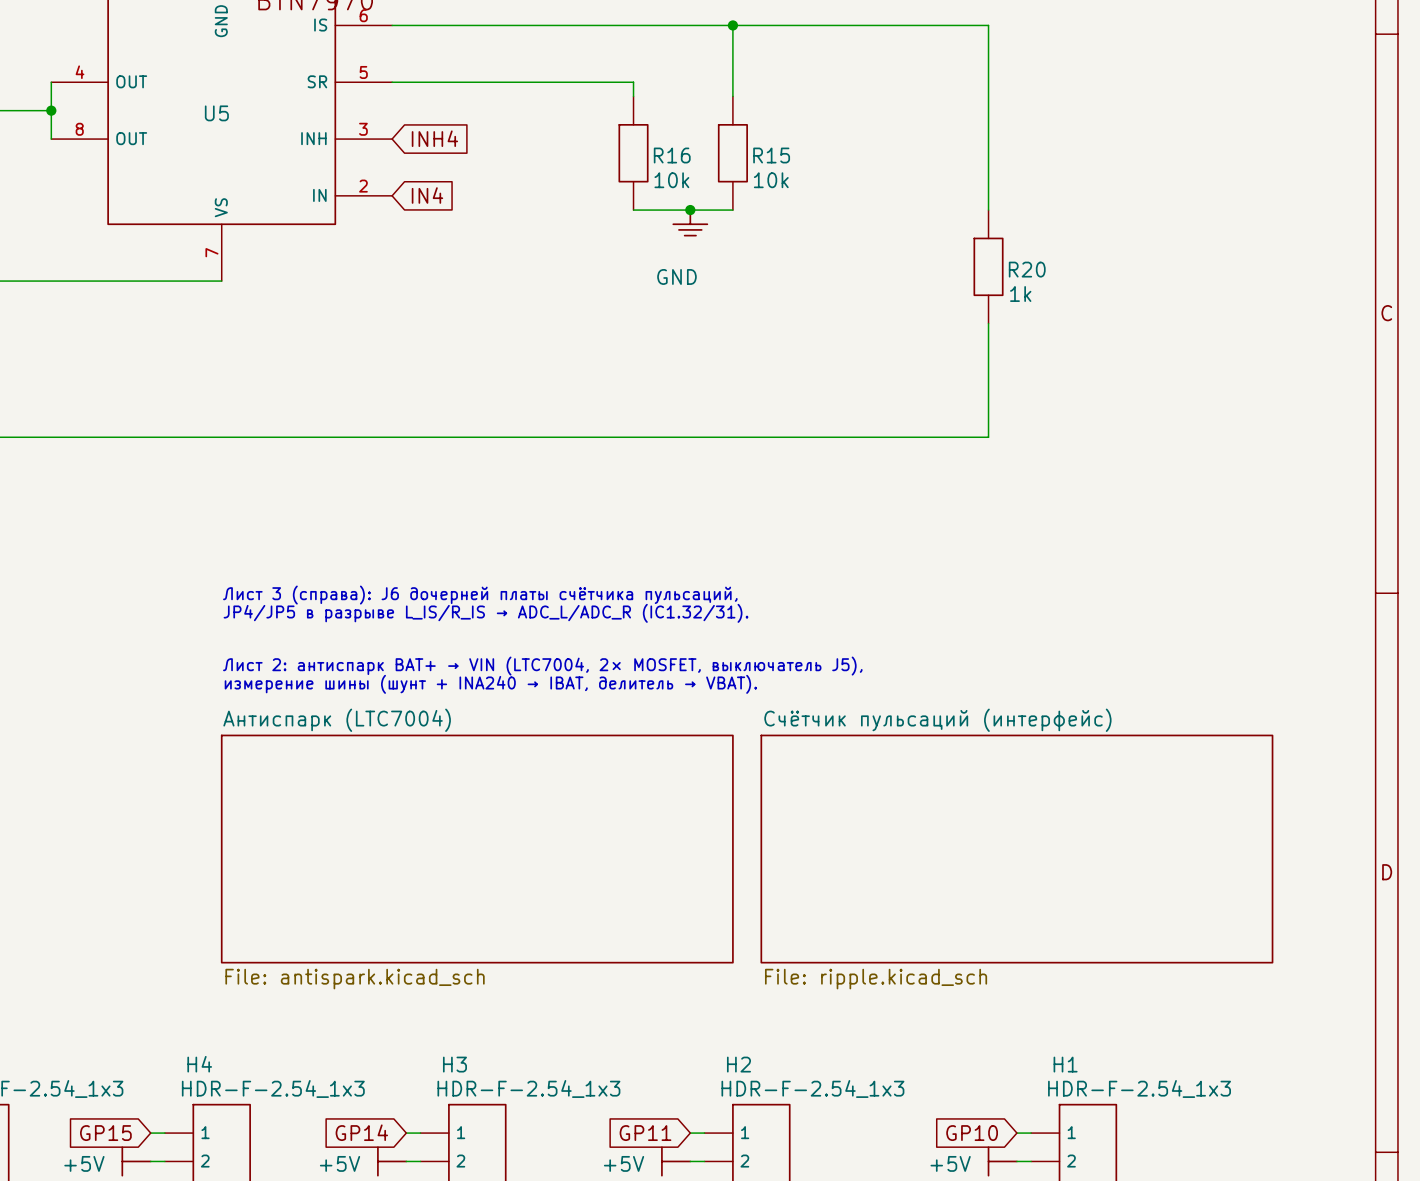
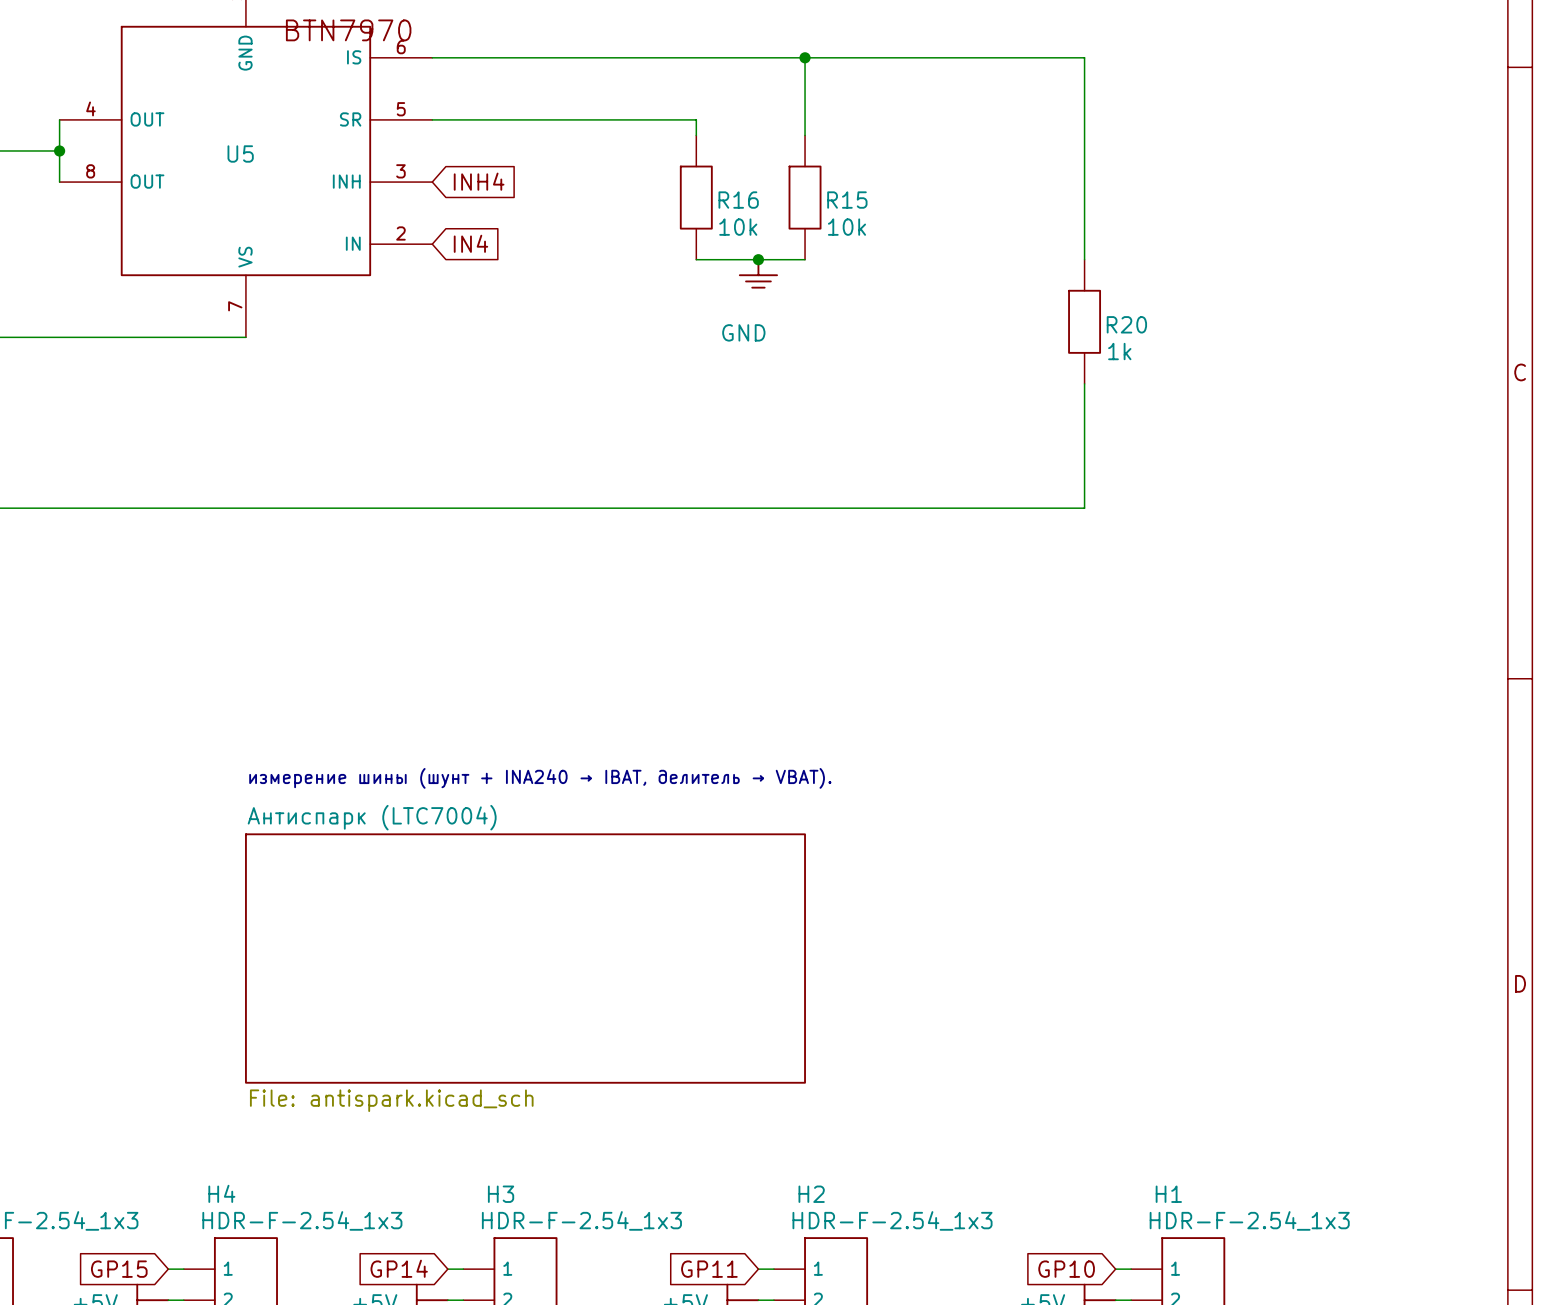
text: Лист 3 (справа): J6 дочерней платы счётчика пульсаций, (480, 595) -> none
text: JP4/JP5 в разрыве L_IS/R_IS → ADC_L/ADC_R (IC1.32/31). (486, 613) -> none
text: Лист 2: антиспарк BAT+ → VIN (LTC7004, 2× MOSFET, выключатель J5), (542, 666) -> none
sheet Счётчик пульсаций (интерфейс): File: ripple.kicad_sch (1016, 849) -> none

